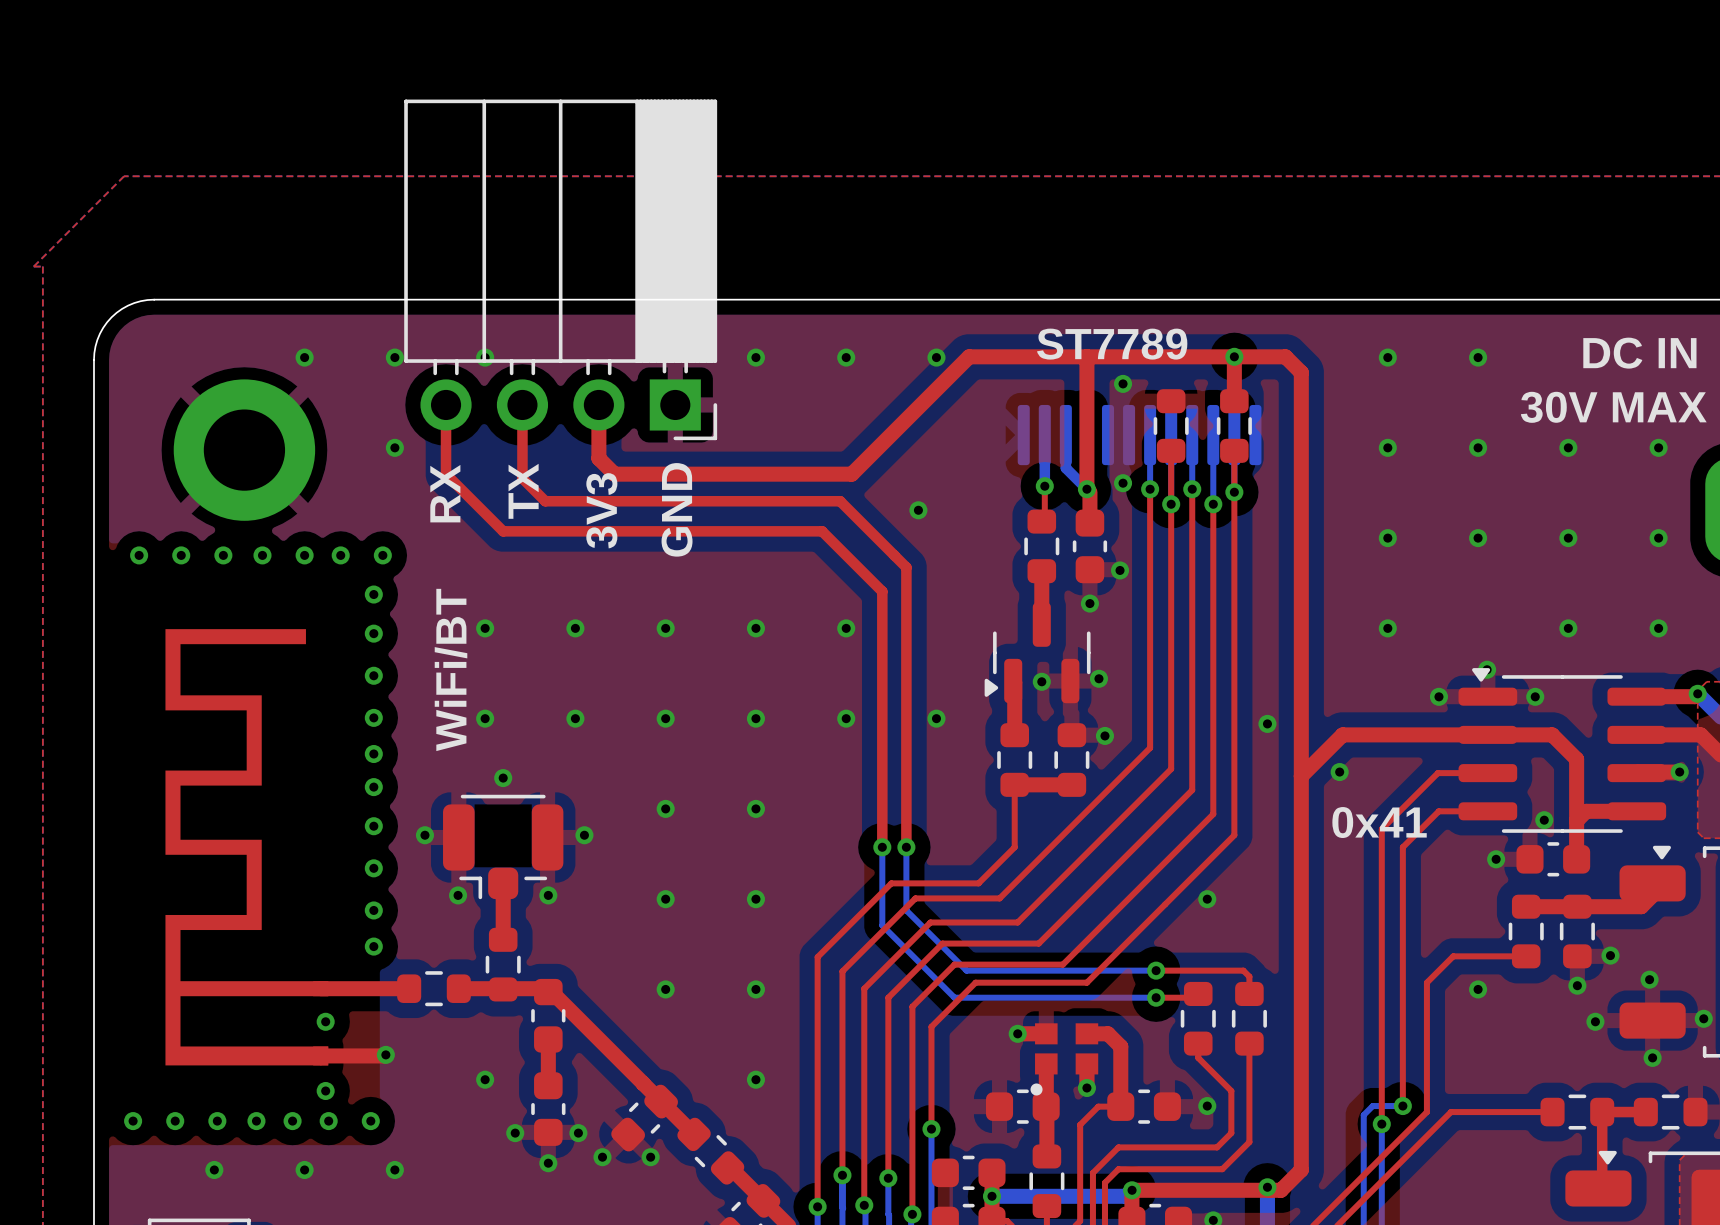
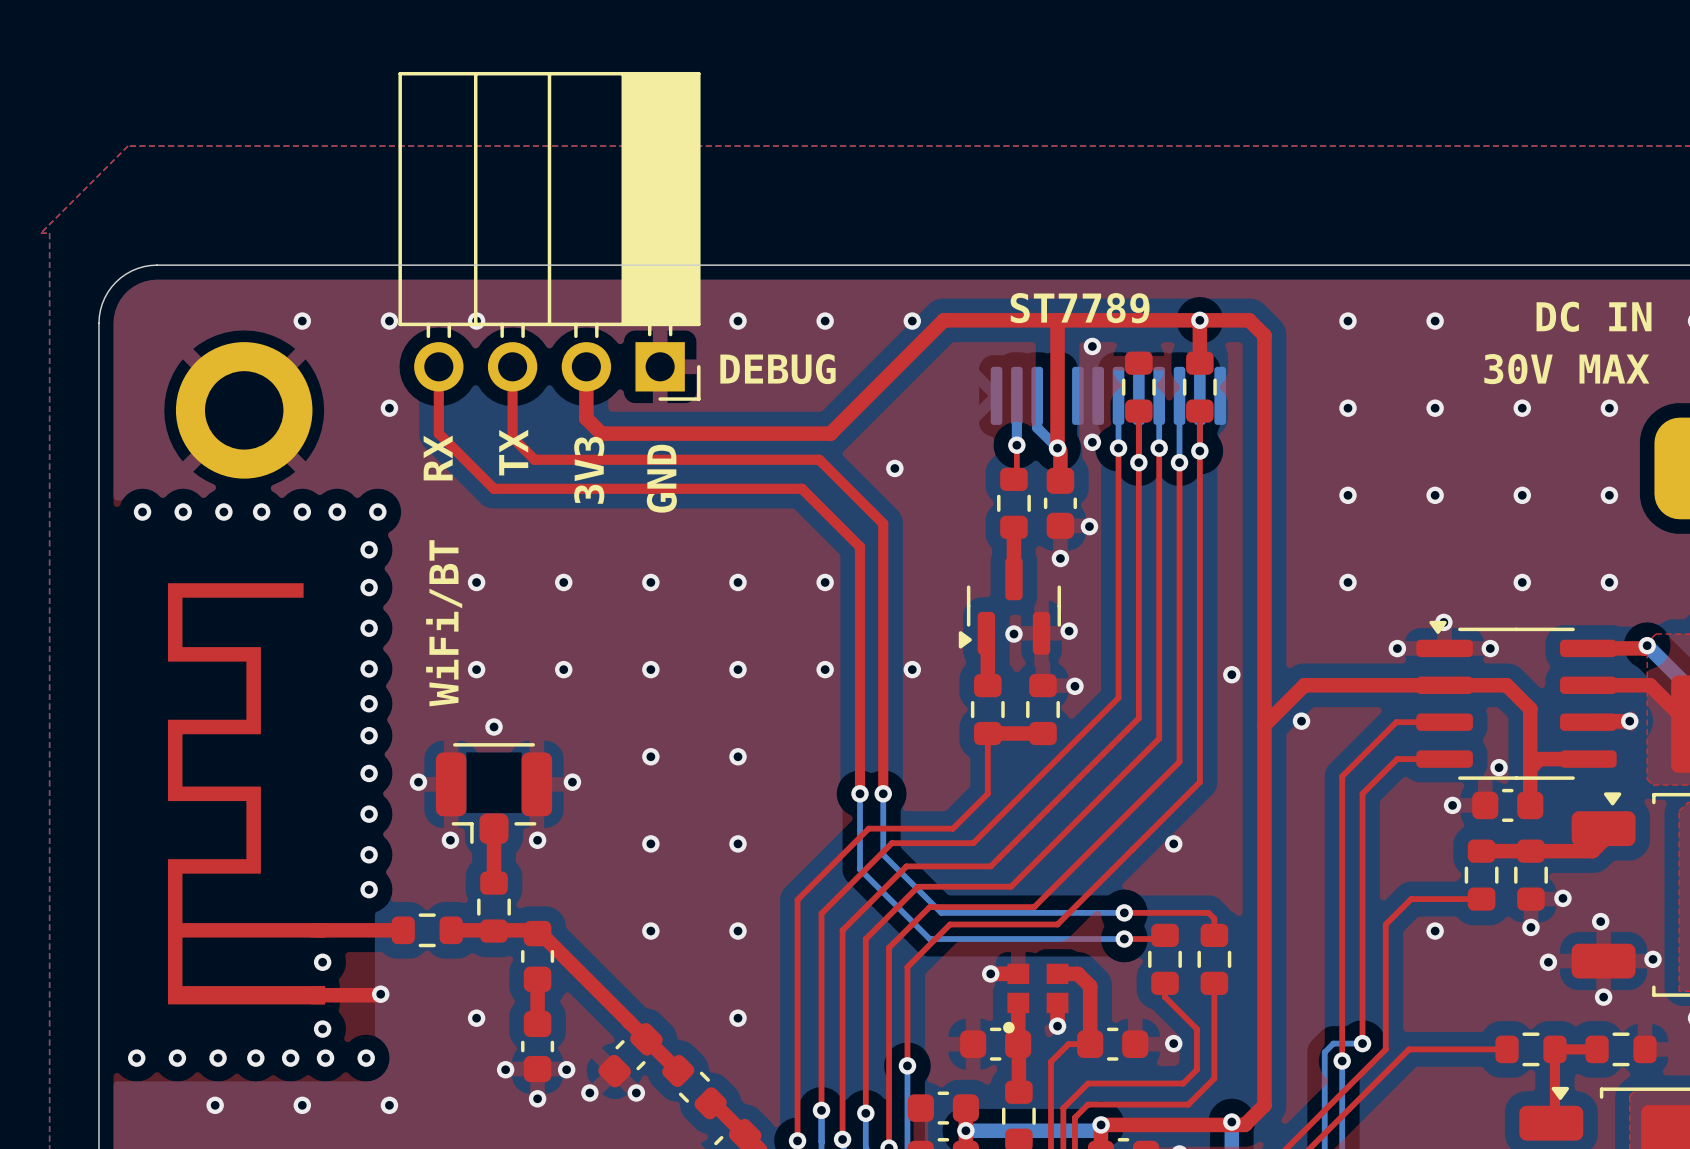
text: none -> DEBUG (777, 369)
text: 0x41 (1379, 822) -> none

